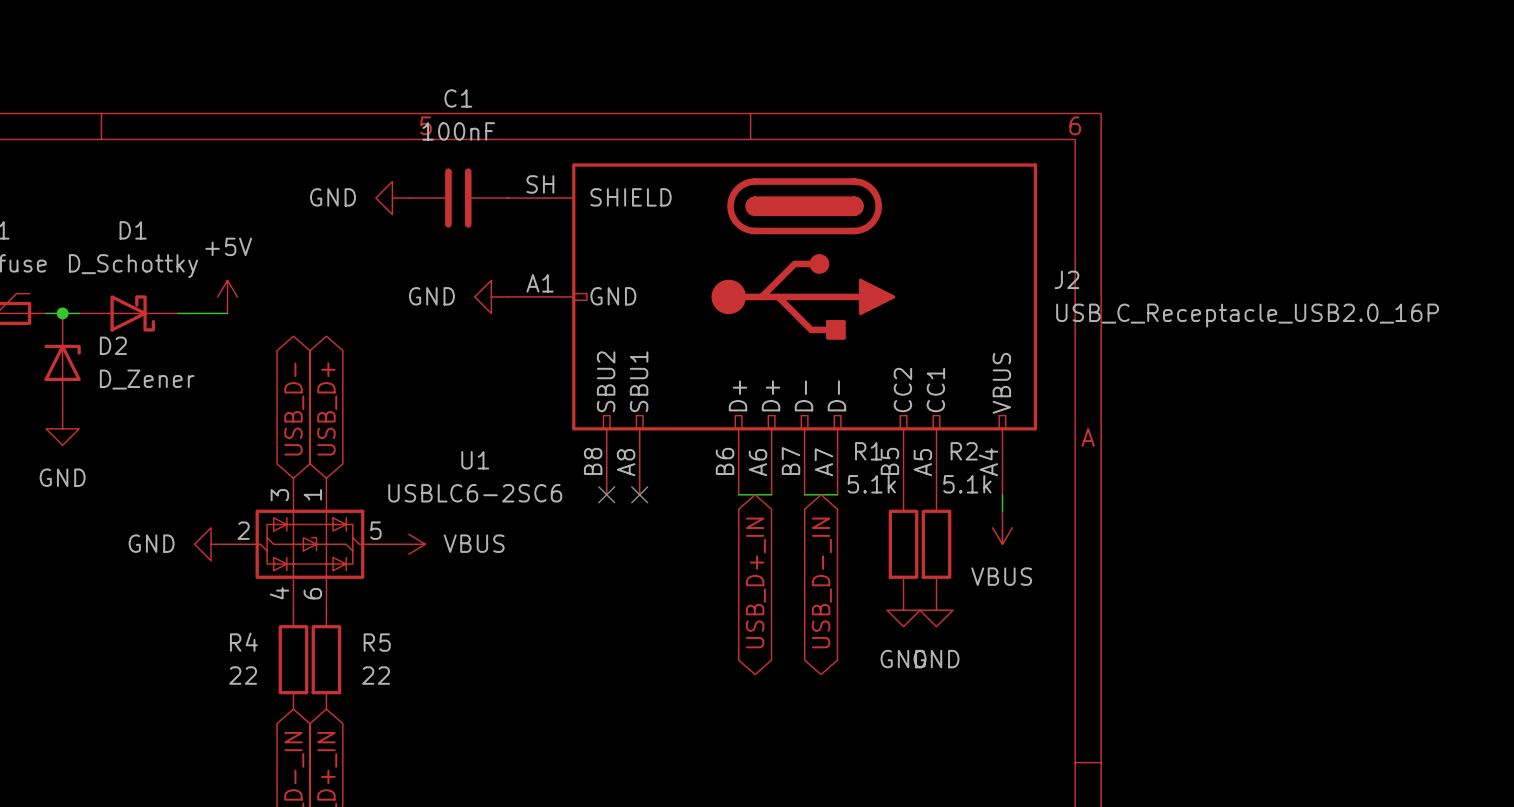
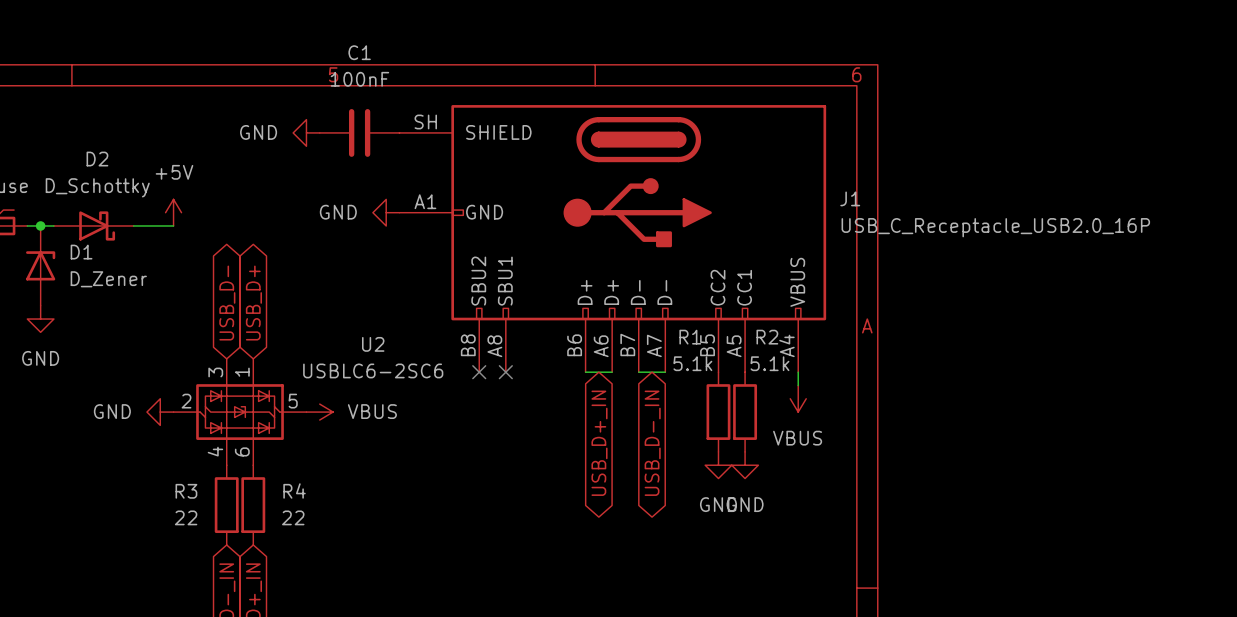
D1 name: D1 (133, 230) -> D2 (97, 159)
J2 name: J2 (1066, 279) -> J1 (850, 198)
D2 name: D2 (113, 345) -> D1 (81, 252)
U1 name: U1 (475, 460) -> U2 (373, 344)
R4 name: R4 (243, 642) -> R3 (186, 491)
R5 name: R5 (377, 642) -> R4 (294, 490)

